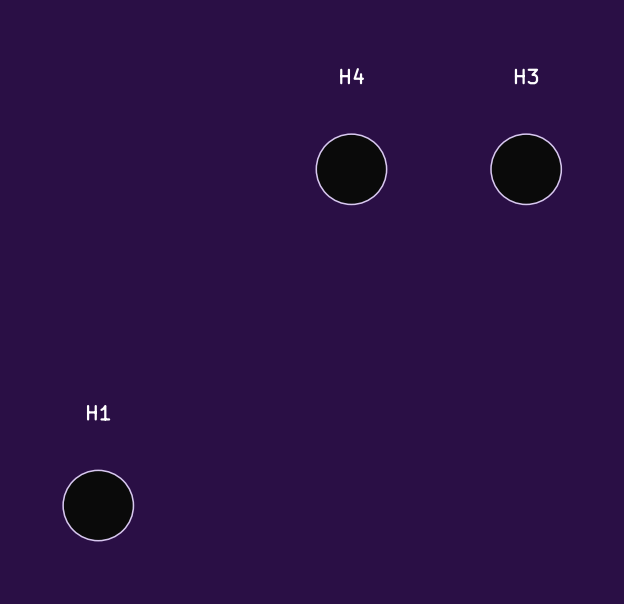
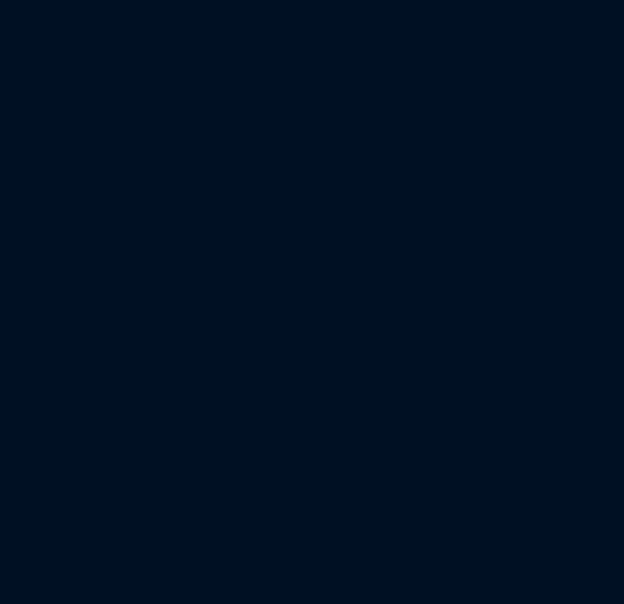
H4: (351, 169) -> none
H3: (526, 169) -> none
H1: (98, 505) -> none

